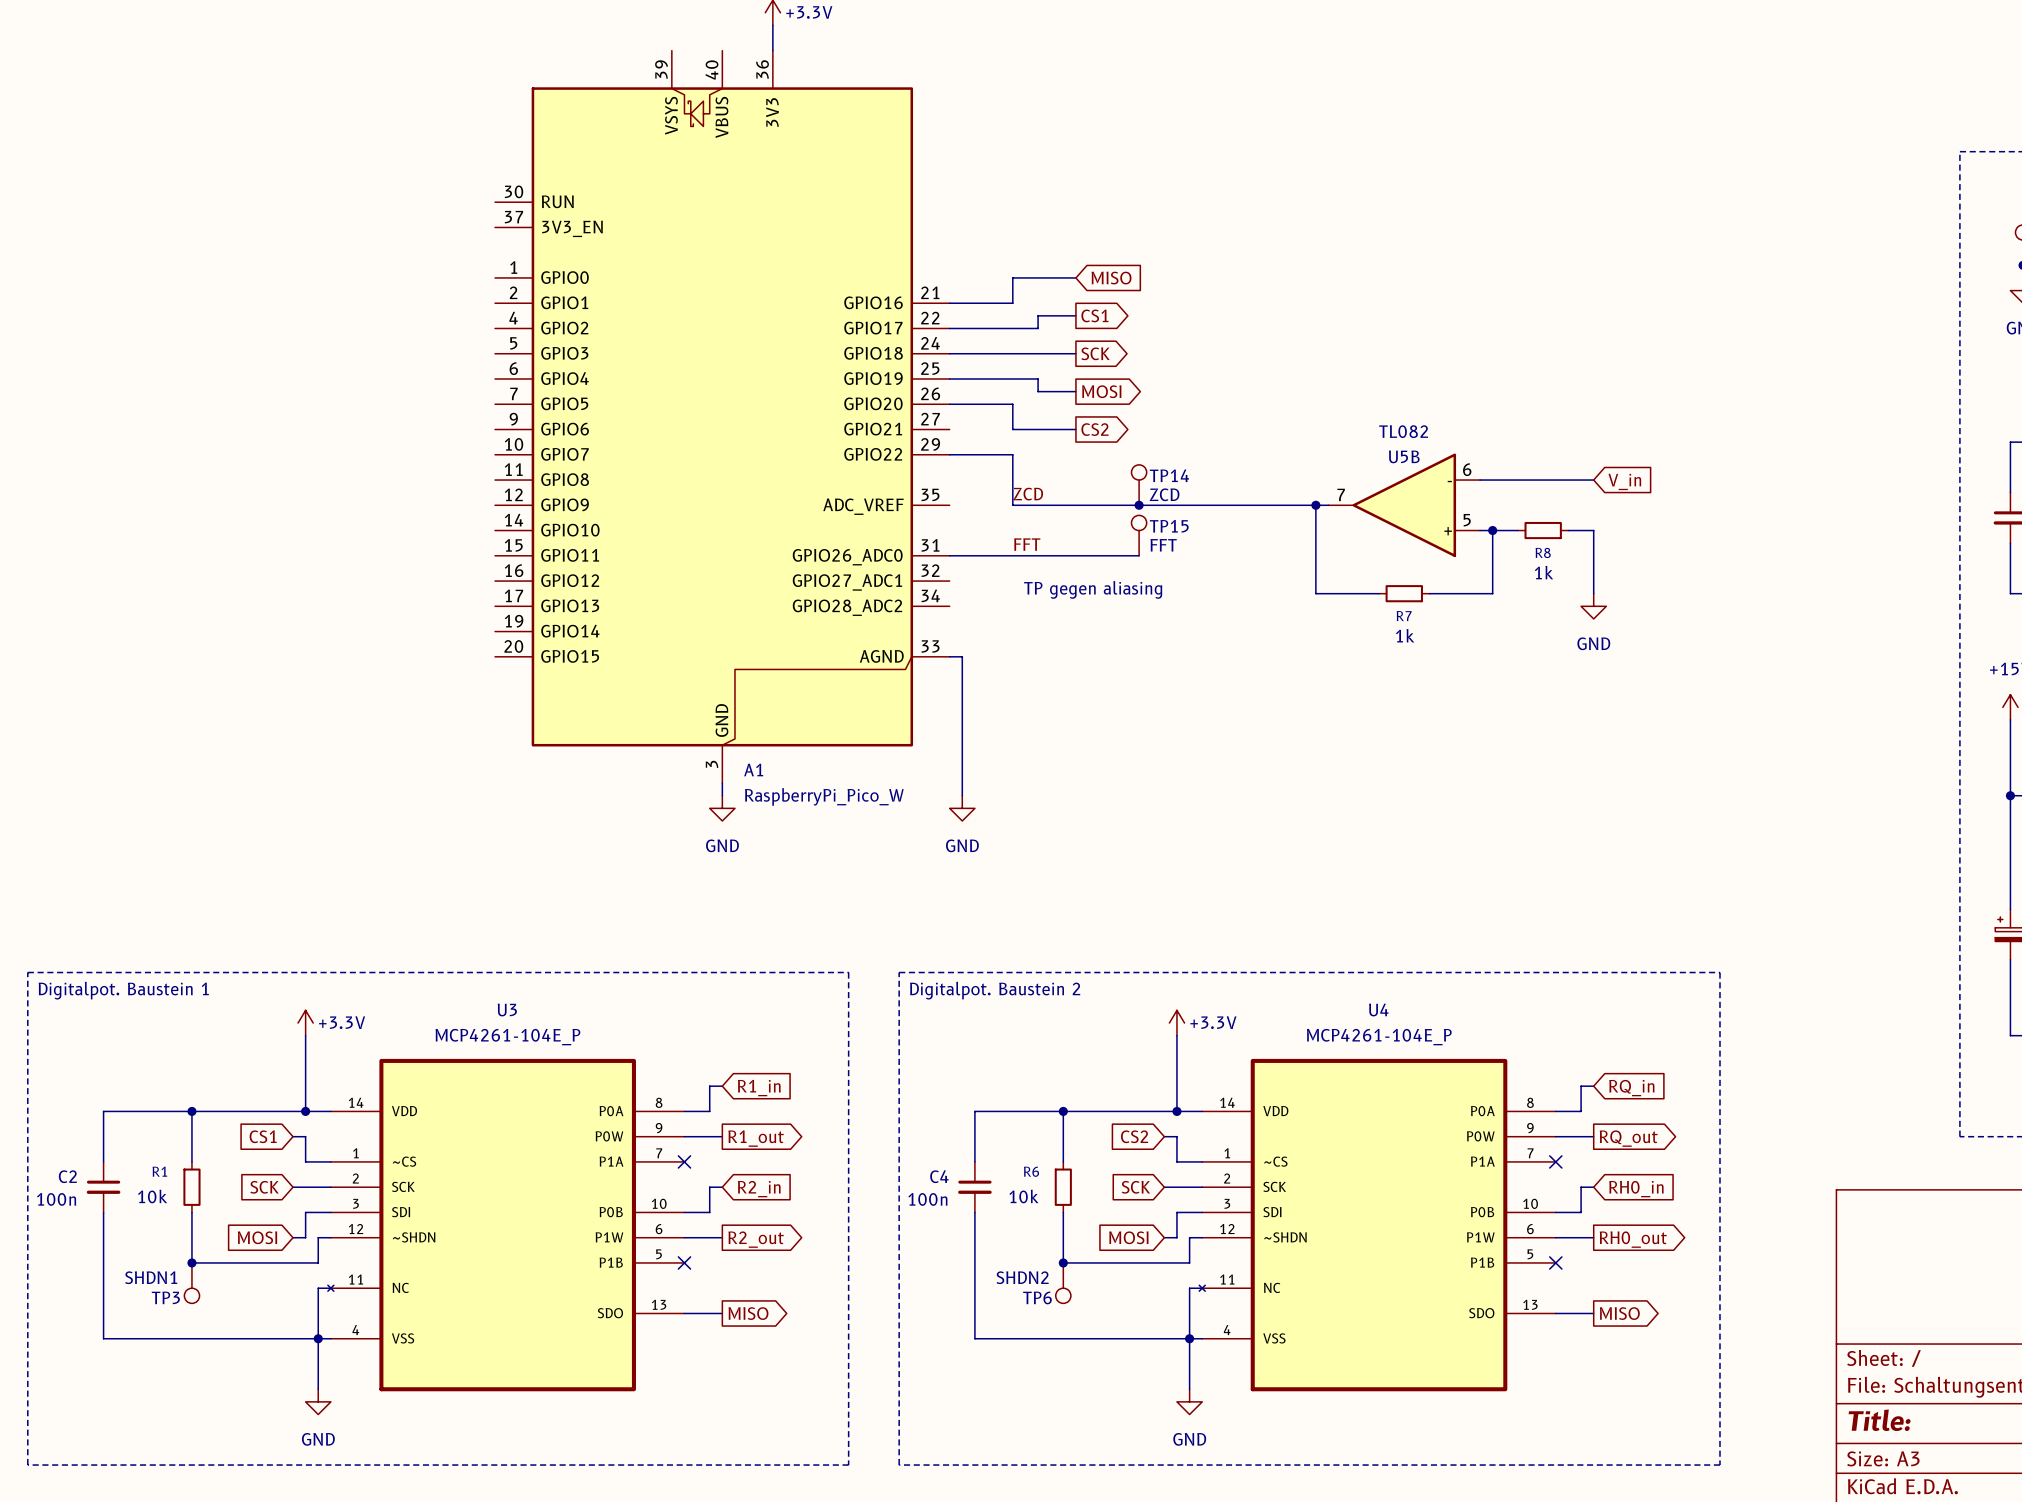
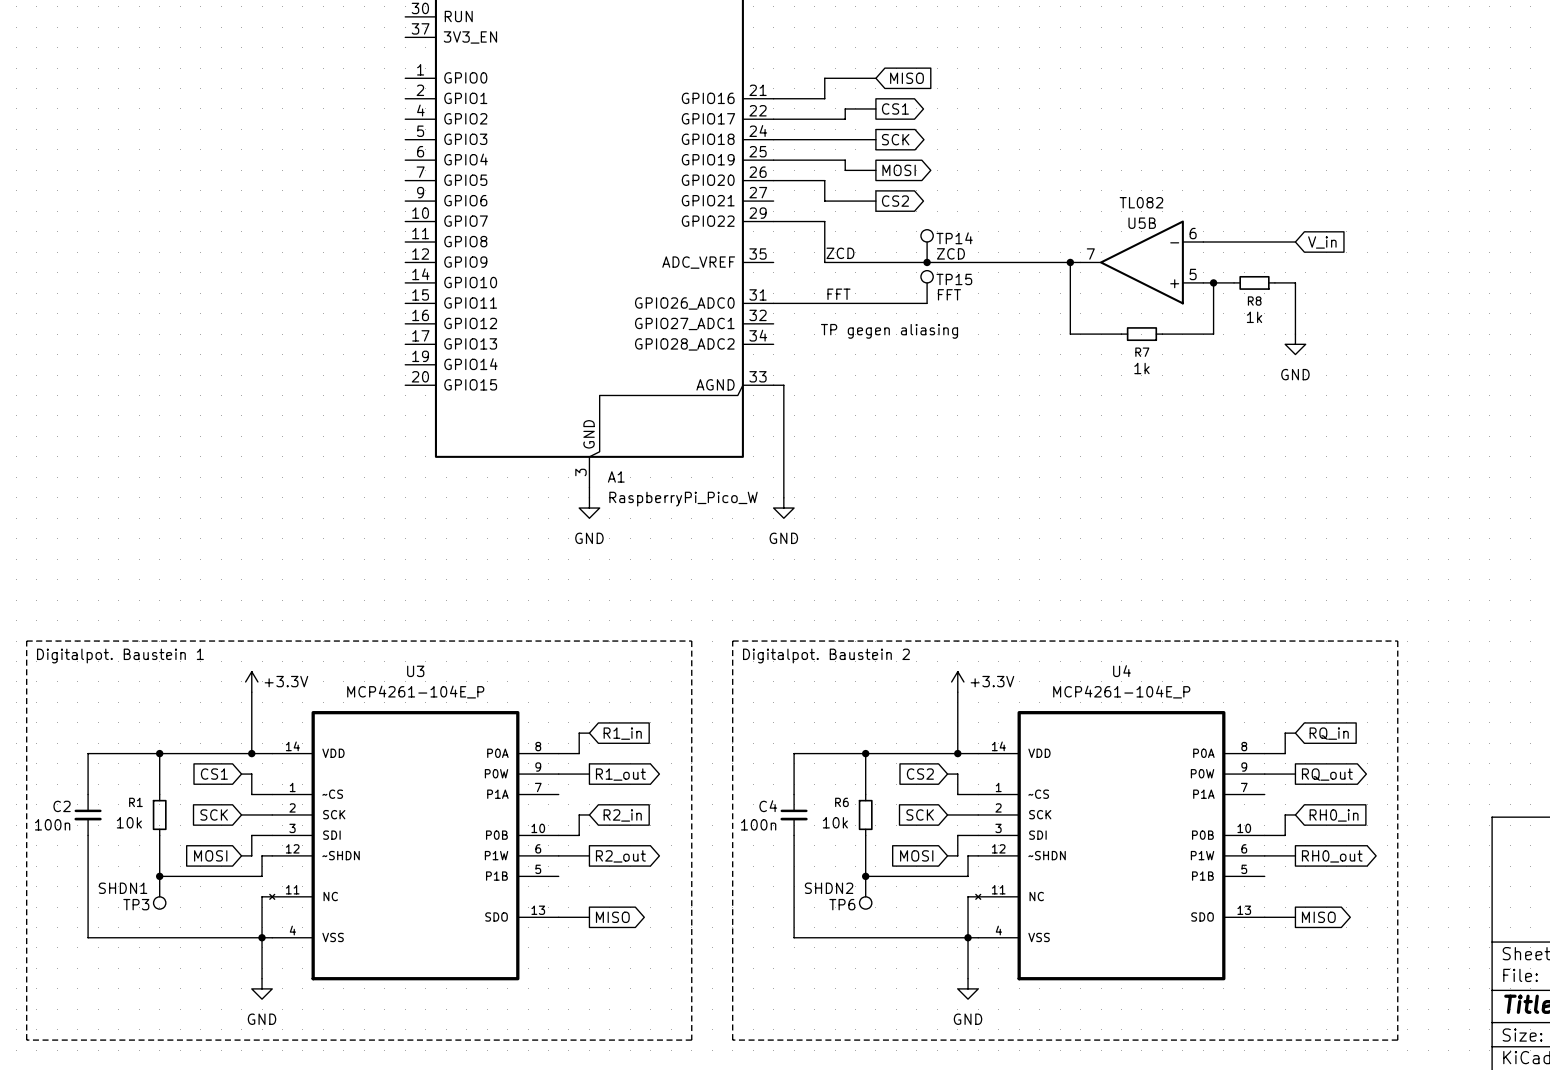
no-connect mark: (684, 1161) -> none
no-connect mark: (1555, 1161) -> none
no-connect mark: (684, 1262) -> none
no-connect mark: (1555, 1262) -> none

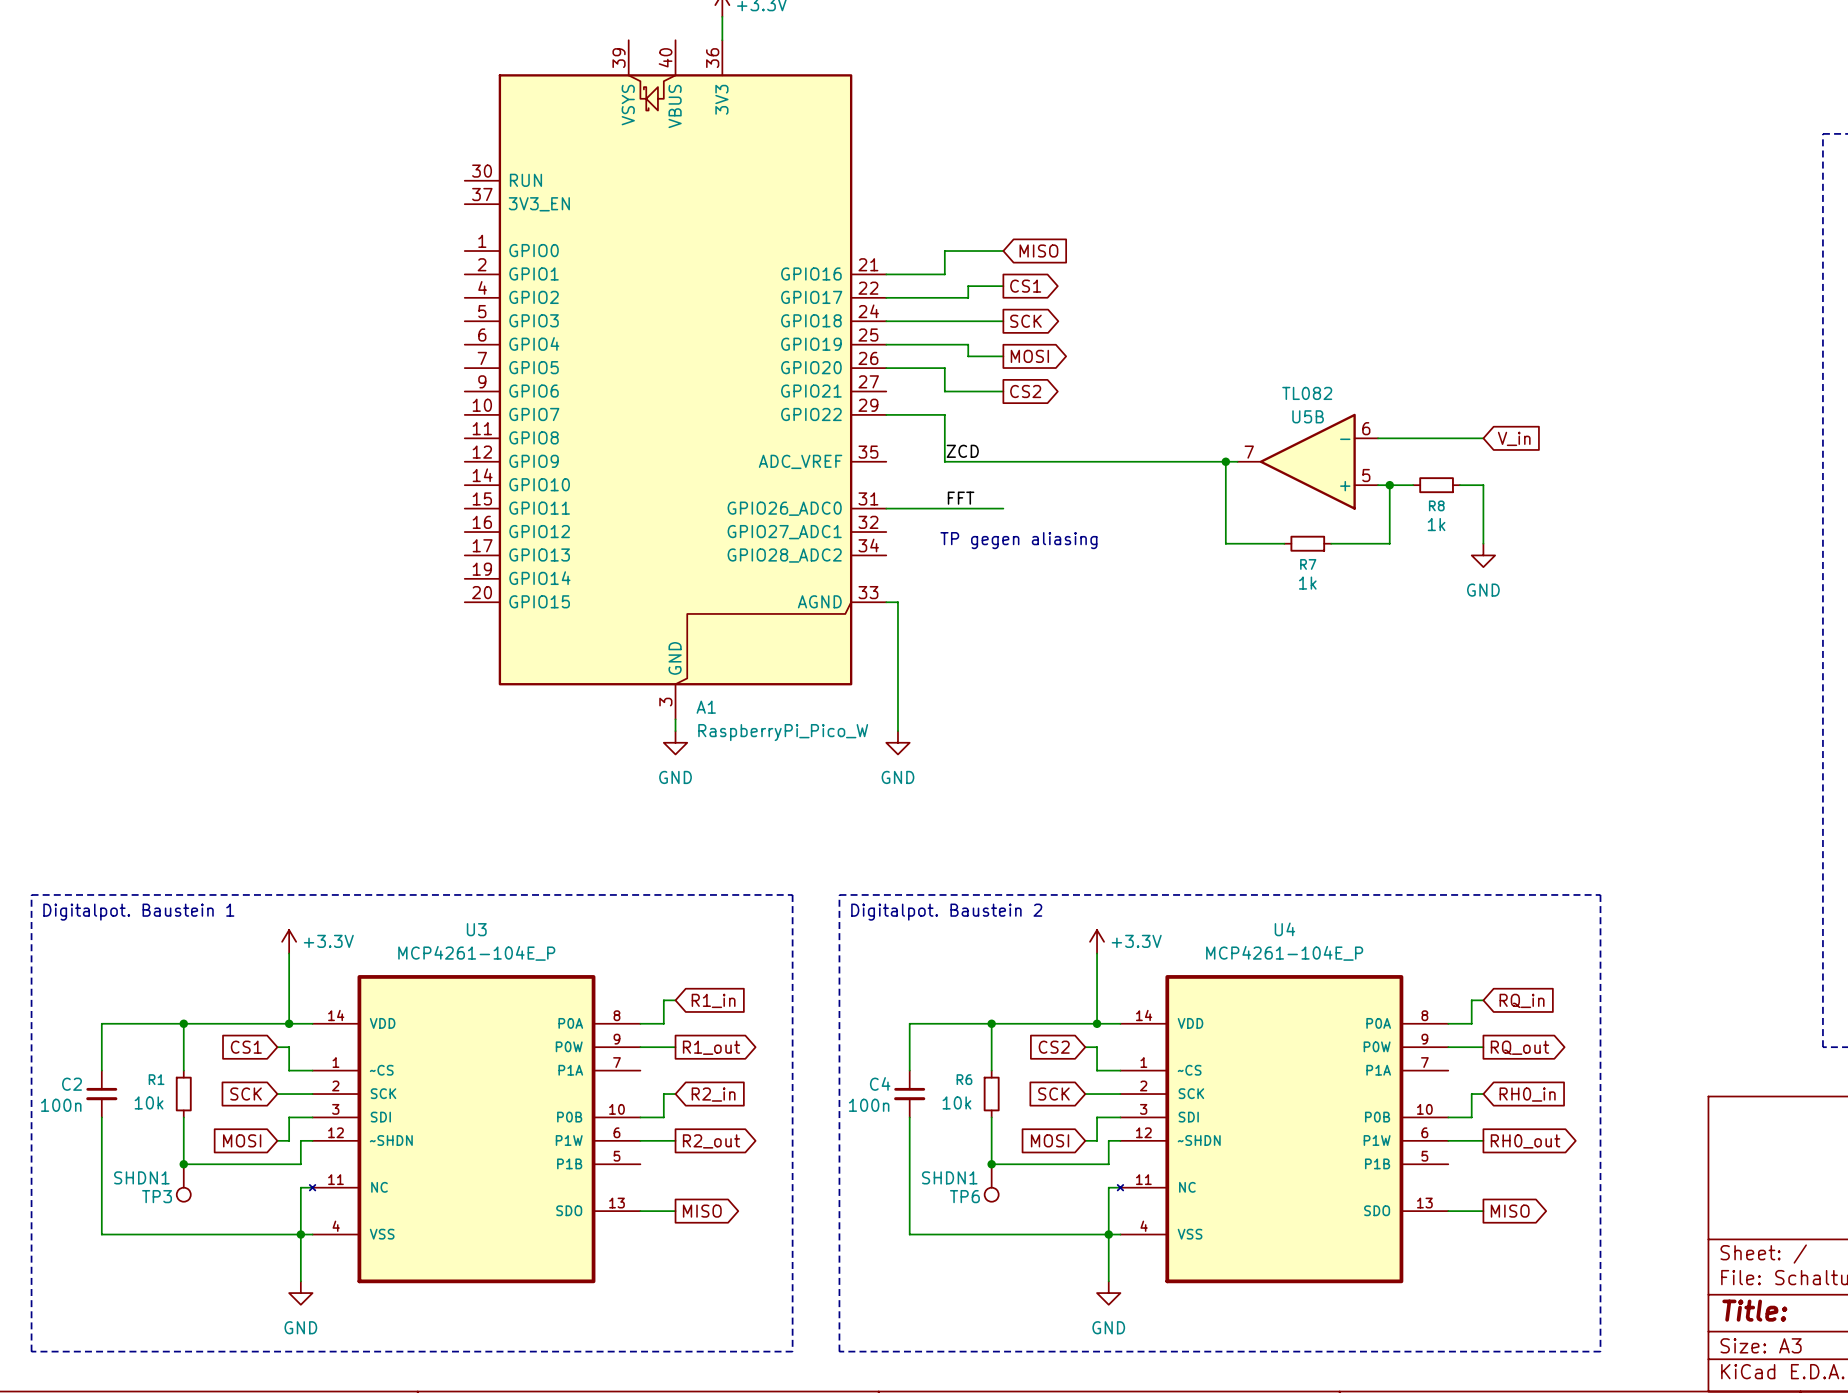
TP14: ZCD (927, 246) -> none
junction: (927, 262) -> none
TP15: FFT (927, 287) -> none
wire: (875, 303) (927, 303) -> none
TP6 value: SHDN2 (829, 888) -> SHDN1 (949, 1177)

